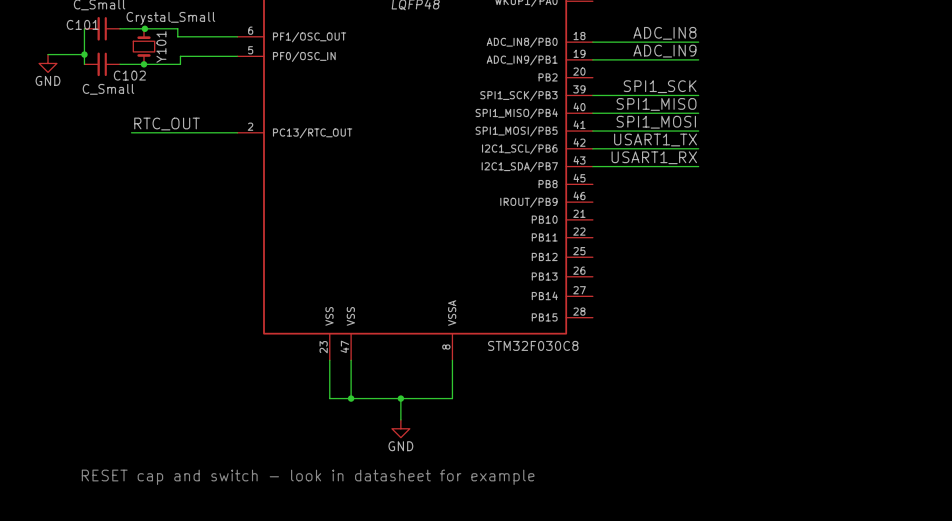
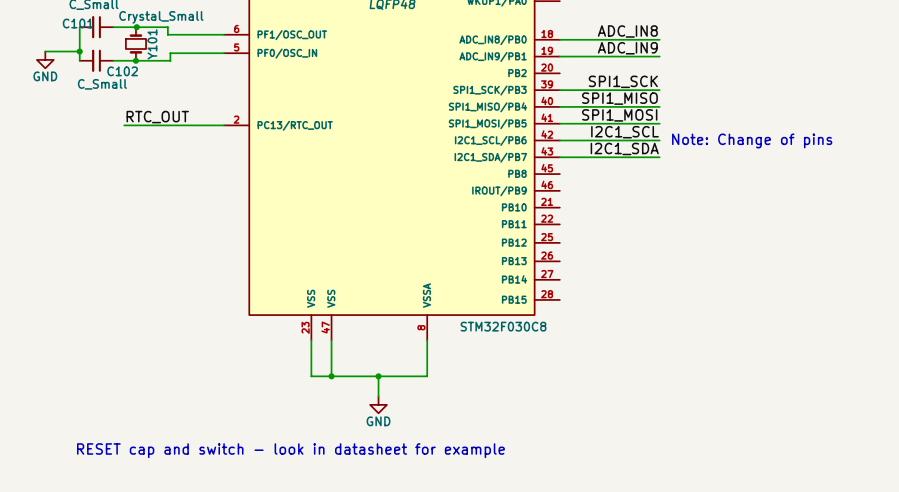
label: USART1_TX (655, 140) -> I2C1_SCL (624, 132)
text: none -> Note: Change of pins (752, 140)
label: USART1_RX (654, 157) -> I2C1_SDA (624, 148)

